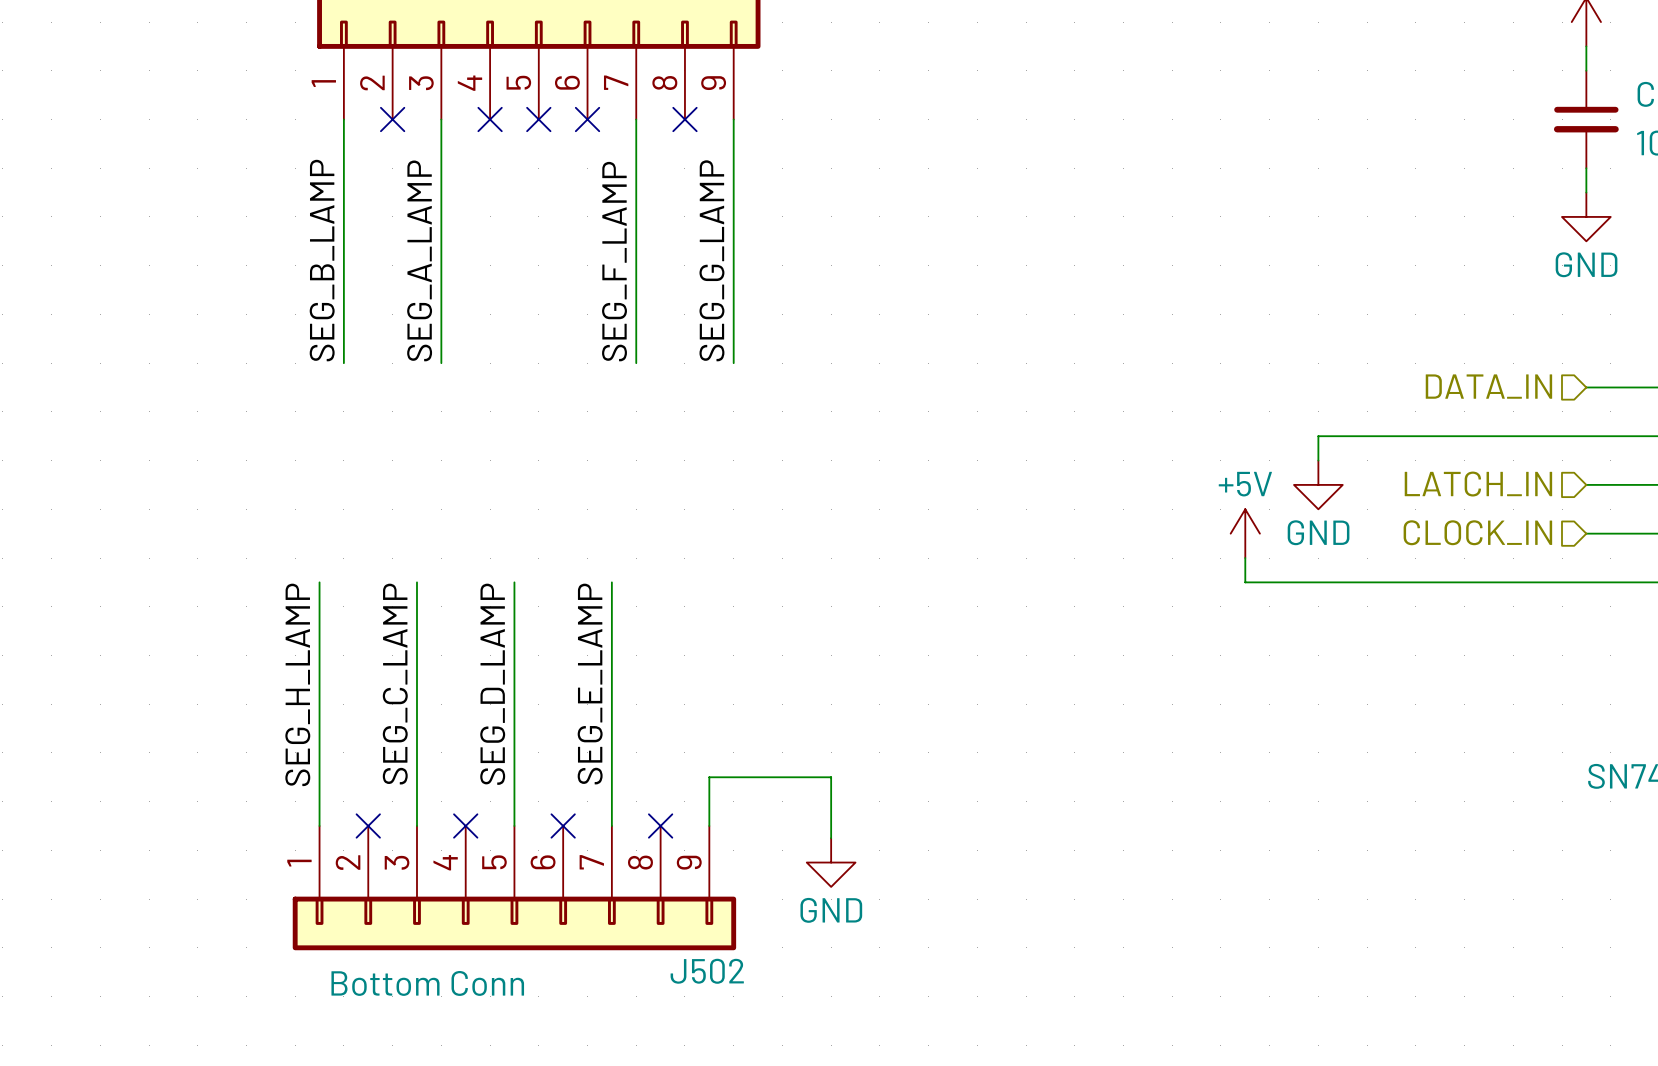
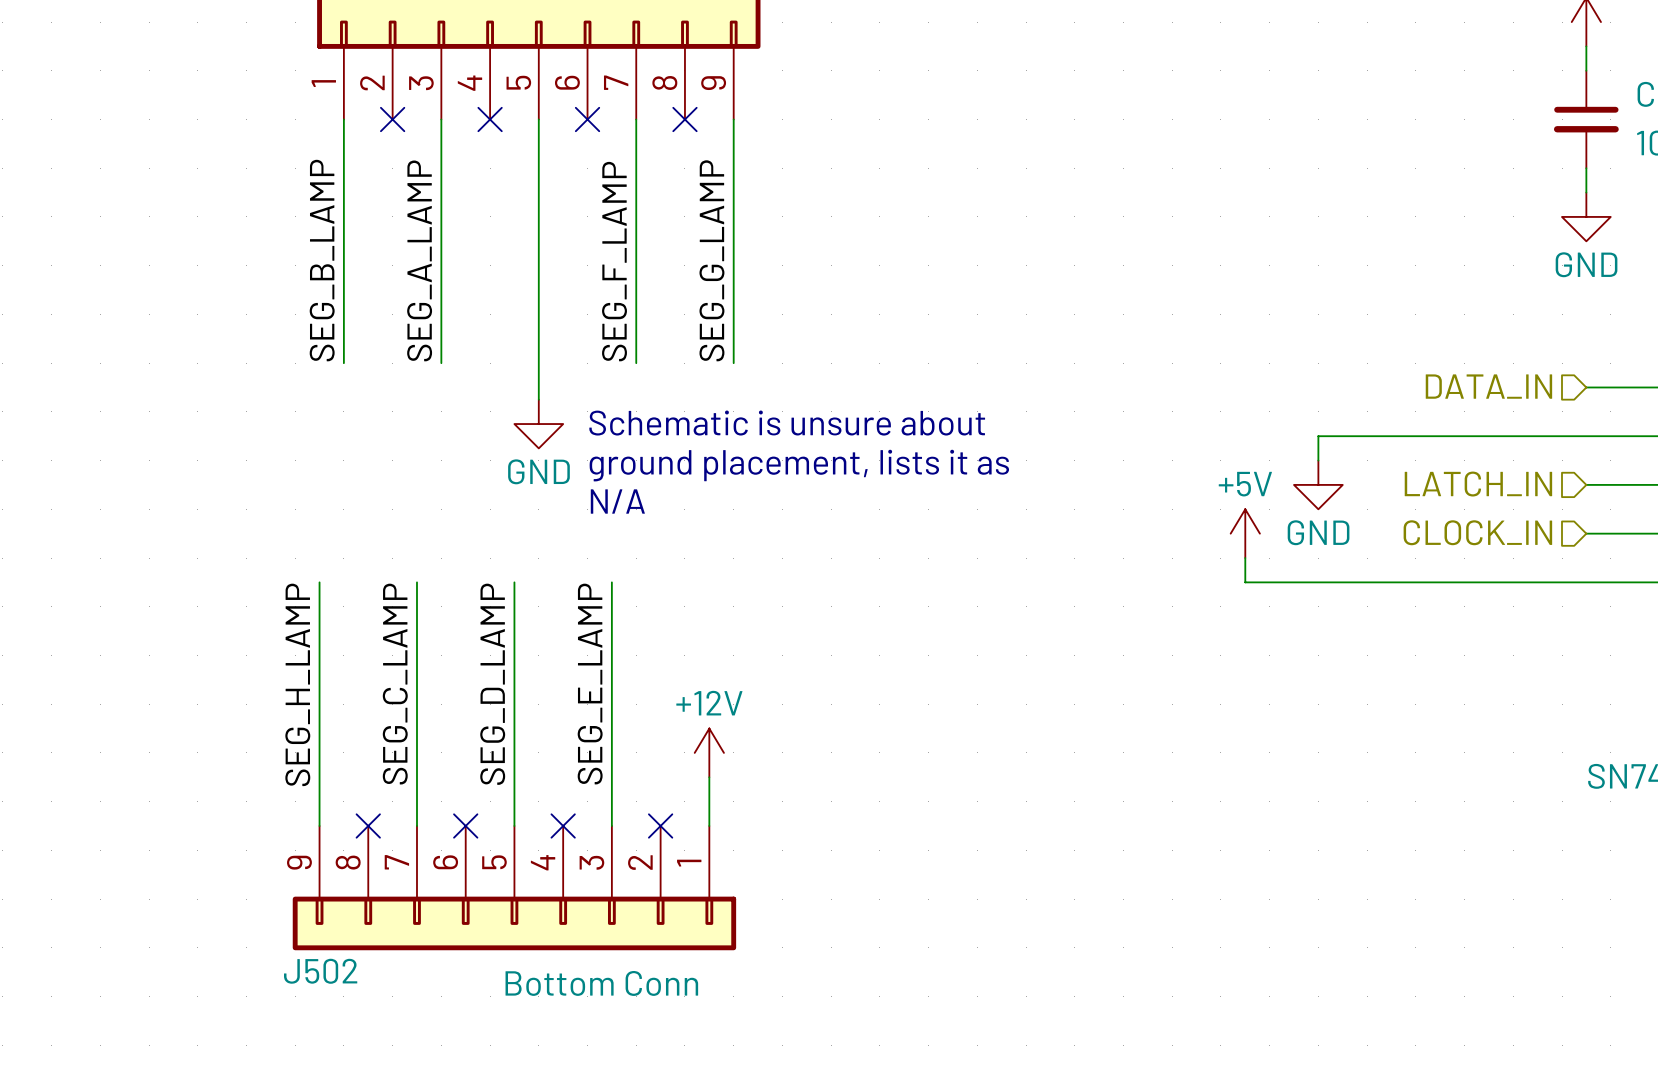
wire: none -> (538, 119) (538, 399)
no-connect mark: (538, 119) -> none
text: none -> Schematic is unsure about (787, 423)
power symbol: none -> GND (538, 424)
text: none -> ground placement, lists it as (799, 465)
text: none -> N/A (617, 501)
power symbol: none -> +12V (709, 752)
wire: (709, 777) (831, 777) (831, 838) -> none
power symbol: GND (831, 862) -> none
J502 flip: as is (514, 923) -> left-right (514, 923)

